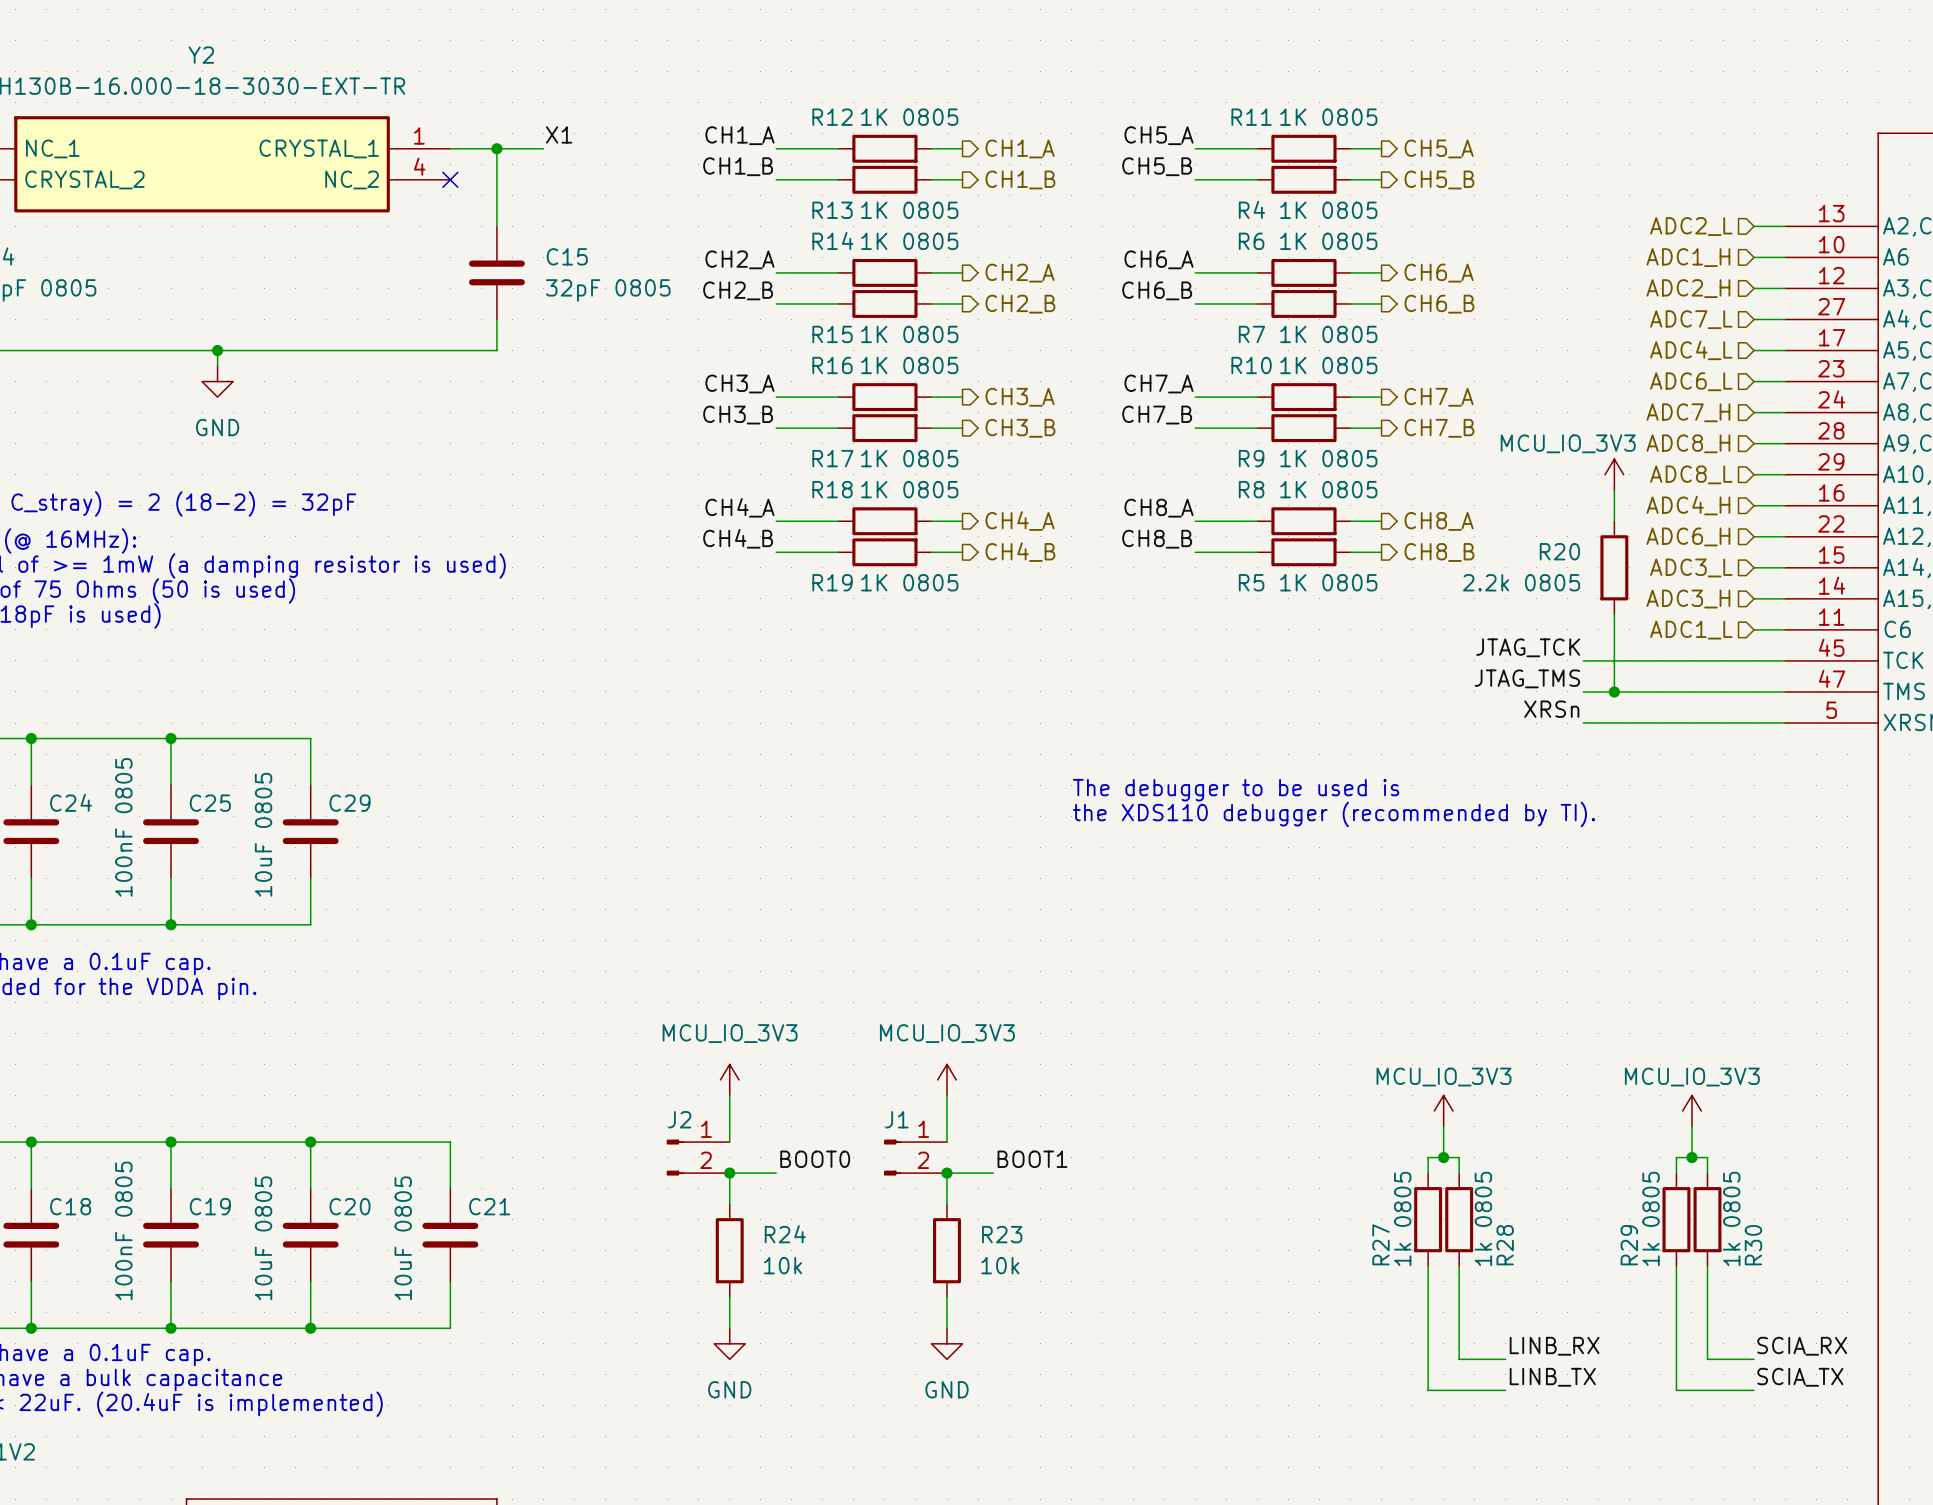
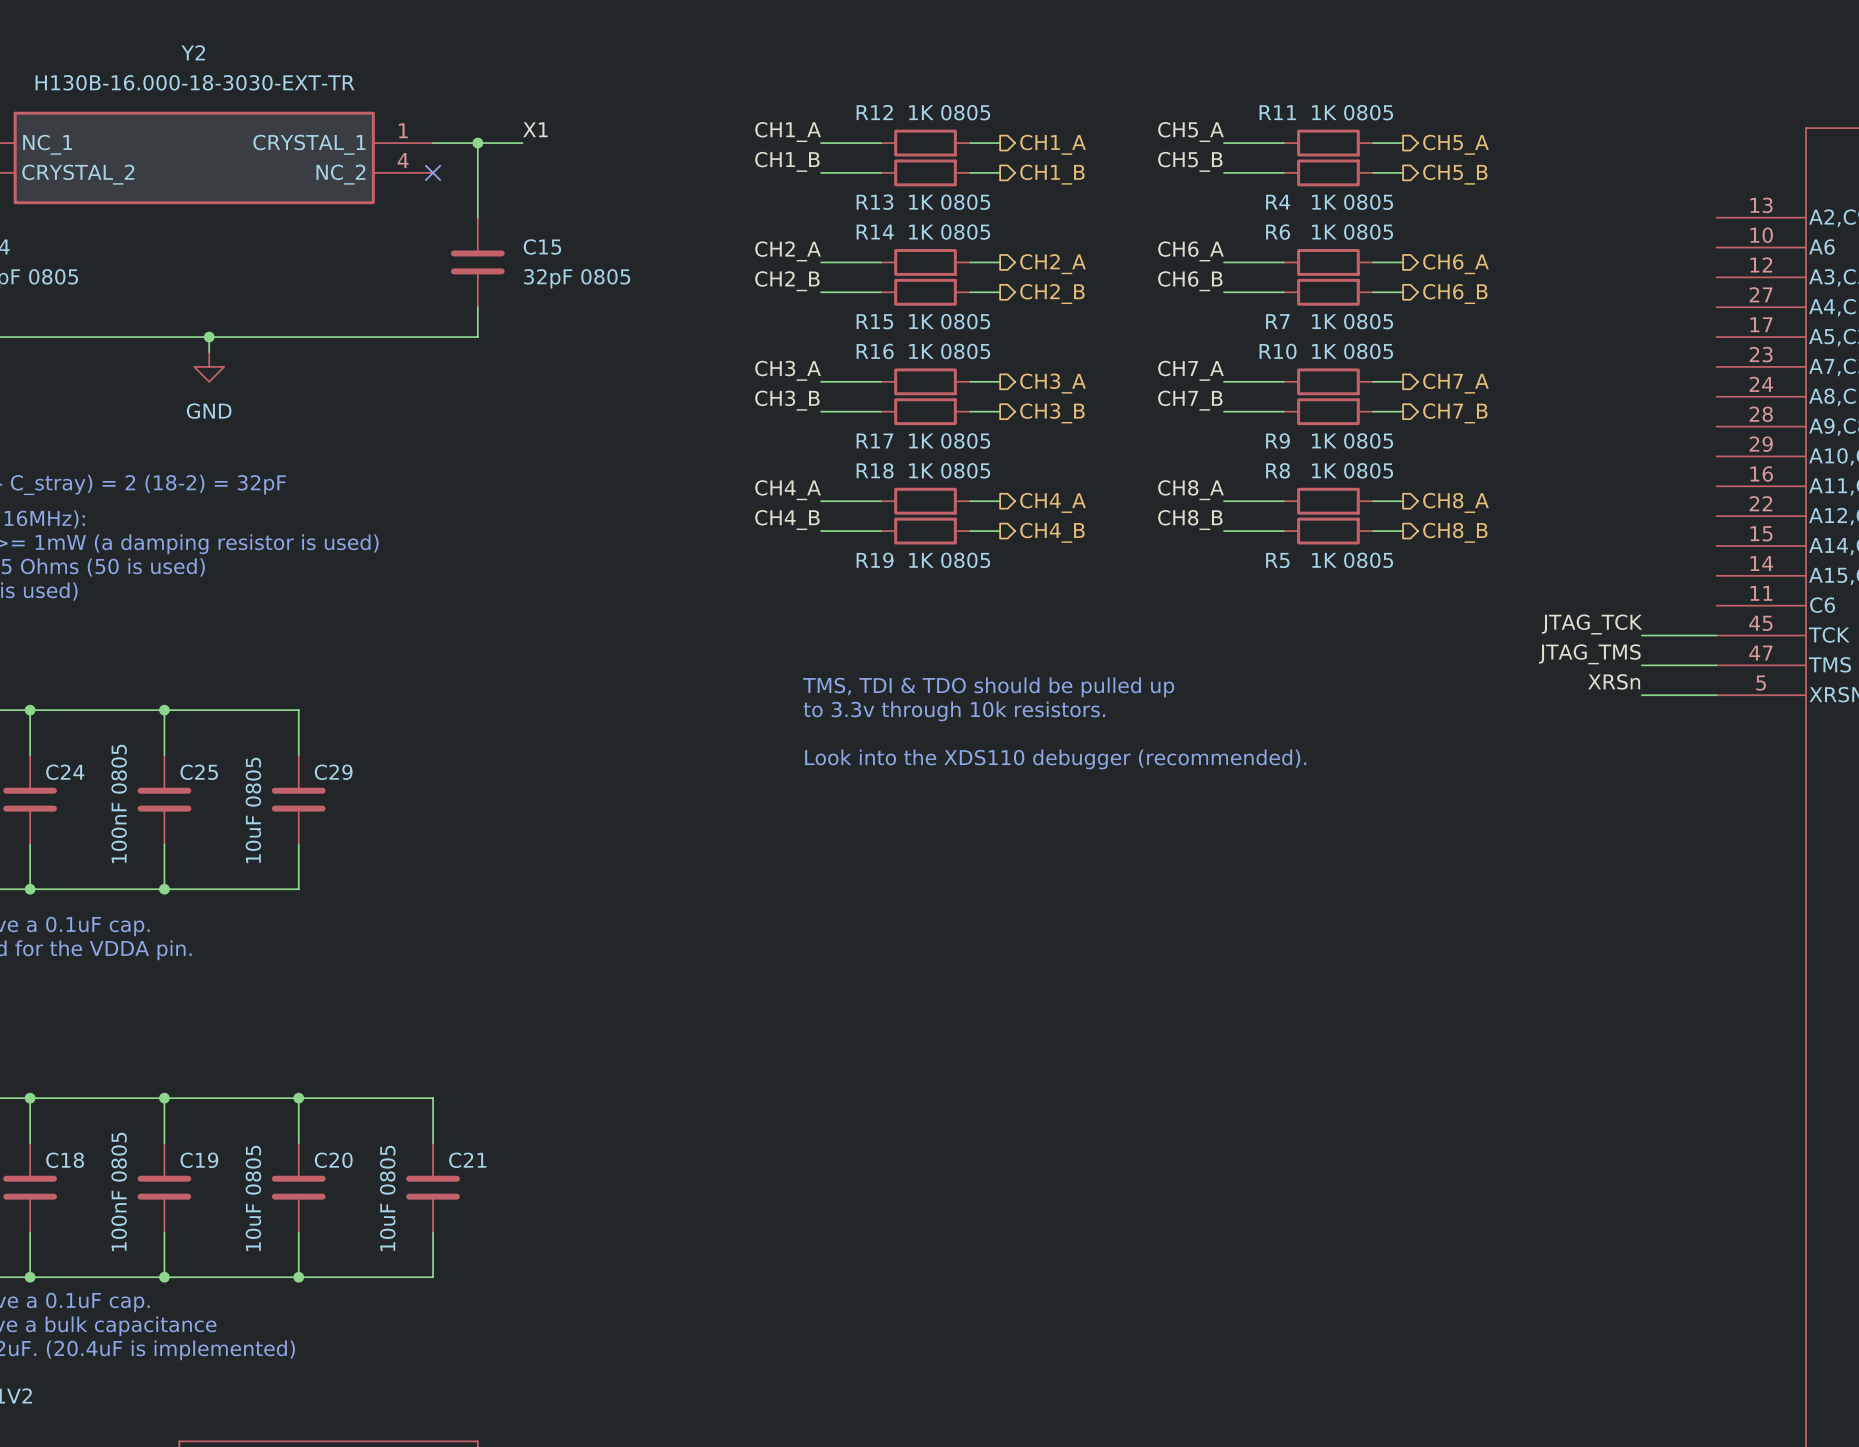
label position: CH1_A (739, 135) -> CH1_A (788, 132)
label position: CH5_A (1159, 135) -> CH5_A (1191, 132)
wire: (776, 148) (838, 148) -> (821, 143) (880, 143)
R12 position: (884, 148) -> (925, 143)
wire: (931, 148) (962, 148) -> (970, 143) (1000, 143)
hierarchical label position: CH1_A (1020, 148) -> CH1_A (1053, 144)
wire: (1195, 148) (1257, 148) -> (1223, 143) (1283, 143)
R11 position: (1303, 148) -> (1328, 143)
wire: (1350, 148) (1381, 148) -> (1373, 143) (1403, 143)
hierarchical label position: CH5_A (1439, 148) -> CH5_A (1455, 144)
label position: CH1_B (738, 166) -> CH1_B (787, 161)
label position: CH5_B (1157, 166) -> CH5_B (1190, 161)
wire: (776, 179) (838, 179) -> (821, 172) (880, 172)
R13 position: (884, 179) -> (925, 172)
wire: (931, 179) (962, 179) -> (970, 172) (1000, 172)
hierarchical label position: CH1_B (1020, 179) -> CH1_B (1052, 174)
wire: (1195, 179) (1257, 179) -> (1223, 172) (1283, 172)
R4 position: (1303, 179) -> (1328, 172)
wire: (1350, 179) (1381, 179) -> (1373, 172) (1403, 172)
hierarchical label position: CH5_B (1439, 179) -> CH5_B (1455, 174)
hierarchical label: ADC2_L (1691, 226) -> none
wire: (1754, 226) (1785, 226) -> none
hierarchical label: ADC1_H (1688, 257) -> none
wire: (1754, 257) (1785, 257) -> none
label position: CH2_A (739, 259) -> CH2_A (788, 251)
label position: CH6_A (1159, 259) -> CH6_A (1191, 251)
wire: (776, 272) (838, 272) -> (821, 262) (880, 262)
R14 position: (884, 272) -> (925, 262)
wire: (931, 272) (962, 272) -> (970, 262) (1000, 262)
wire: (1195, 272) (1257, 272) -> (1223, 262) (1283, 262)
R6 position: (1303, 272) -> (1328, 262)
wire: (1350, 272) (1381, 272) -> (1373, 262) (1403, 262)
hierarchical label position: CH2_A (1020, 273) -> CH2_A (1053, 264)
hierarchical label position: CH6_A (1439, 273) -> CH6_A (1455, 264)
hierarchical label: ADC2_H (1688, 288) -> none
wire: (1754, 288) (1785, 288) -> none
label position: CH2_B (738, 290) -> CH2_B (787, 281)
label position: CH6_B (1157, 290) -> CH6_B (1190, 281)
wire: (776, 303) (838, 303) -> (821, 292) (880, 292)
R15 position: (884, 303) -> (925, 292)
wire: (931, 303) (962, 303) -> (970, 292) (1000, 292)
wire: (1195, 303) (1257, 303) -> (1223, 292) (1283, 292)
R7 position: (1303, 303) -> (1328, 292)
wire: (1350, 303) (1381, 303) -> (1373, 292) (1403, 292)
hierarchical label position: CH2_B (1020, 304) -> CH2_B (1052, 294)
hierarchical label position: CH6_B (1439, 304) -> CH6_B (1455, 294)
hierarchical label: ADC7_L (1691, 319) -> none
wire: (1754, 319) (1785, 319) -> none
hierarchical label: ADC4_L (1691, 350) -> none
wire: (1754, 350) (1785, 350) -> none
hierarchical label: ADC6_L (1691, 381) -> none
wire: (1754, 381) (1785, 381) -> none
label position: CH3_A (739, 383) -> CH3_A (788, 370)
label position: CH7_A (1159, 383) -> CH7_A (1191, 370)
wire: (776, 397) (838, 397) -> (821, 381) (880, 381)
R16 position: (884, 397) -> (925, 381)
wire: (931, 397) (962, 397) -> (970, 381) (1000, 381)
hierarchical label position: CH3_A (1020, 397) -> CH3_A (1053, 383)
wire: (1195, 397) (1257, 397) -> (1223, 381) (1283, 381)
R10 position: (1303, 397) -> (1328, 381)
wire: (1350, 397) (1381, 397) -> (1373, 381) (1403, 381)
hierarchical label position: CH7_A (1439, 397) -> CH7_A (1455, 383)
hierarchical label: ADC7_H (1688, 412) -> none
wire: (1754, 412) (1785, 412) -> none
label position: CH3_B (738, 415) -> CH3_B (787, 400)
label position: CH7_B (1157, 415) -> CH7_B (1190, 400)
wire: (776, 428) (838, 428) -> (821, 411) (880, 411)
R17 position: (884, 428) -> (925, 411)
wire: (931, 428) (962, 428) -> (970, 411) (1000, 411)
hierarchical label position: CH3_B (1020, 428) -> CH3_B (1052, 413)
wire: (1195, 428) (1257, 428) -> (1223, 411) (1283, 411)
R9 position: (1303, 428) -> (1328, 411)
wire: (1350, 428) (1381, 428) -> (1373, 411) (1403, 411)
hierarchical label position: CH7_B (1439, 428) -> CH7_B (1455, 413)
hierarchical label: ADC8_H (1688, 443) -> none
wire: (1754, 443) (1785, 443) -> none
power symbol: MCU_IO_3V3 (1614, 474) -> none
hierarchical label: ADC8_L (1691, 474) -> none
wire: (1754, 474) (1785, 474) -> none
wire: (1614, 490) (1614, 521) -> none
hierarchical label: ADC4_H (1688, 505) -> none
wire: (1754, 505) (1785, 505) -> none
label position: CH4_A (739, 507) -> CH4_A (788, 490)
label position: CH8_A (1159, 508) -> CH8_A (1191, 490)
wire: (776, 521) (838, 521) -> (821, 501) (880, 501)
R18 position: (884, 521) -> (925, 501)
wire: (931, 521) (962, 521) -> (970, 501) (1000, 501)
hierarchical label position: CH4_A (1020, 521) -> CH4_A (1053, 502)
wire: (1195, 521) (1257, 521) -> (1223, 501) (1283, 501)
R8 position: (1303, 521) -> (1328, 501)
wire: (1350, 521) (1381, 521) -> (1373, 501) (1403, 501)
hierarchical label position: CH8_A (1439, 521) -> CH8_A (1455, 502)
hierarchical label: ADC6_H (1688, 536) -> none
wire: (1754, 536) (1785, 536) -> none
label position: CH4_B (738, 538) -> CH4_B (787, 520)
label position: CH8_B (1157, 539) -> CH8_B (1190, 520)
wire: (776, 552) (838, 552) -> (821, 531) (880, 531)
R19 position: (884, 552) -> (925, 531)
wire: (931, 552) (962, 552) -> (970, 531) (1000, 531)
hierarchical label position: CH4_B (1020, 552) -> CH4_B (1052, 532)
wire: (1195, 552) (1257, 552) -> (1223, 531) (1283, 531)
R5 position: (1303, 552) -> (1328, 531)
wire: (1350, 552) (1381, 552) -> (1373, 531) (1403, 531)
hierarchical label position: CH8_B (1439, 552) -> CH8_B (1455, 532)
R20: 2.2k 0805 (1614, 567) -> none
hierarchical label: ADC3_L (1691, 567) -> none
wire: (1754, 567) (1785, 567) -> none
wire: (1754, 598) (1785, 598) -> none
hierarchical label: ADC3_H (1688, 599) -> none
wire: (1614, 614) (1614, 691) -> none
wire: (1754, 629) (1785, 629) -> none
hierarchical label: ADC1_L (1691, 630) -> none
label position: JTAG_TCK (1528, 647) -> JTAG_TCK (1592, 624)
wire: (1583, 660) (1707, 660) -> none
label position: JTAG_TMS (1527, 678) -> JTAG_TMS (1589, 654)
wire: (1583, 691) (1707, 691) -> none
junction: (1614, 691) -> none
label position: XRSn (1551, 709) -> XRSn (1614, 681)
text: none -> TMS, TDI & TDO should be pulled up (988, 687)
wire: (1583, 723) (1707, 723) -> none
text: none -> to 3.3v through 10k resistors. (954, 711)
text: The debugger to be used is (1236, 790) -> none
text: the XDS110 debugger (recommended by TI). (1334, 814) -> Look into the XDS110 debugger (recommended). (1055, 759)
power symbol: MCU_IO_3V3 (729, 1079) -> none
power symbol: MCU_IO_3V3 (947, 1079) -> none
wire: (729, 1095) (729, 1142) -> none
wire: (947, 1095) (947, 1142) -> none
power symbol: MCU_IO_3V3 (1443, 1111) -> none
power symbol: MCU_IO_3V3 (1691, 1111) -> none
wire: (1443, 1126) (1443, 1157) -> none
wire: (1691, 1126) (1691, 1157) -> none
J2: (698, 1157) -> none
J1: (915, 1157) -> none
junction: (1443, 1157) -> none
junction: (1691, 1157) -> none
label: BOOT0 (815, 1159) -> none
label: BOOT1 (1032, 1159) -> none
junction: (729, 1173) -> none
wire: (776, 1173) (729, 1173) (729, 1204) -> none
junction: (947, 1173) -> none
wire: (993, 1173) (947, 1173) (947, 1204) -> none
wire: (1428, 1173) (1428, 1157) (1459, 1157) (1459, 1173) -> none
wire: (1676, 1173) (1676, 1157) (1707, 1157) (1707, 1173) -> none
R27: 1k 0805 (1428, 1219) -> none
R28: 1k 0805 (1459, 1219) -> none
R29: 1k 0805 (1676, 1219) -> none
R30: 1k 0805 (1707, 1219) -> none
R24: 10k (729, 1250) -> none
R23: 10k (947, 1250) -> none
wire: (1428, 1266) (1428, 1390) (1505, 1390) -> none
wire: (1459, 1266) (1459, 1359) (1505, 1359) -> none
wire: (1676, 1266) (1676, 1390) (1754, 1390) -> none
wire: (1707, 1266) (1707, 1359) (1754, 1359) -> none
wire: (729, 1297) (729, 1328) -> none
wire: (947, 1297) (947, 1328) -> none
power symbol: GND (729, 1343) -> none
power symbol: GND (947, 1343) -> none
label: LINB_RX (1554, 1346) -> none
label: SCIA_RX (1802, 1346) -> none
label: LINB_TX (1552, 1377) -> none
label: SCIA_TX (1800, 1377) -> none

